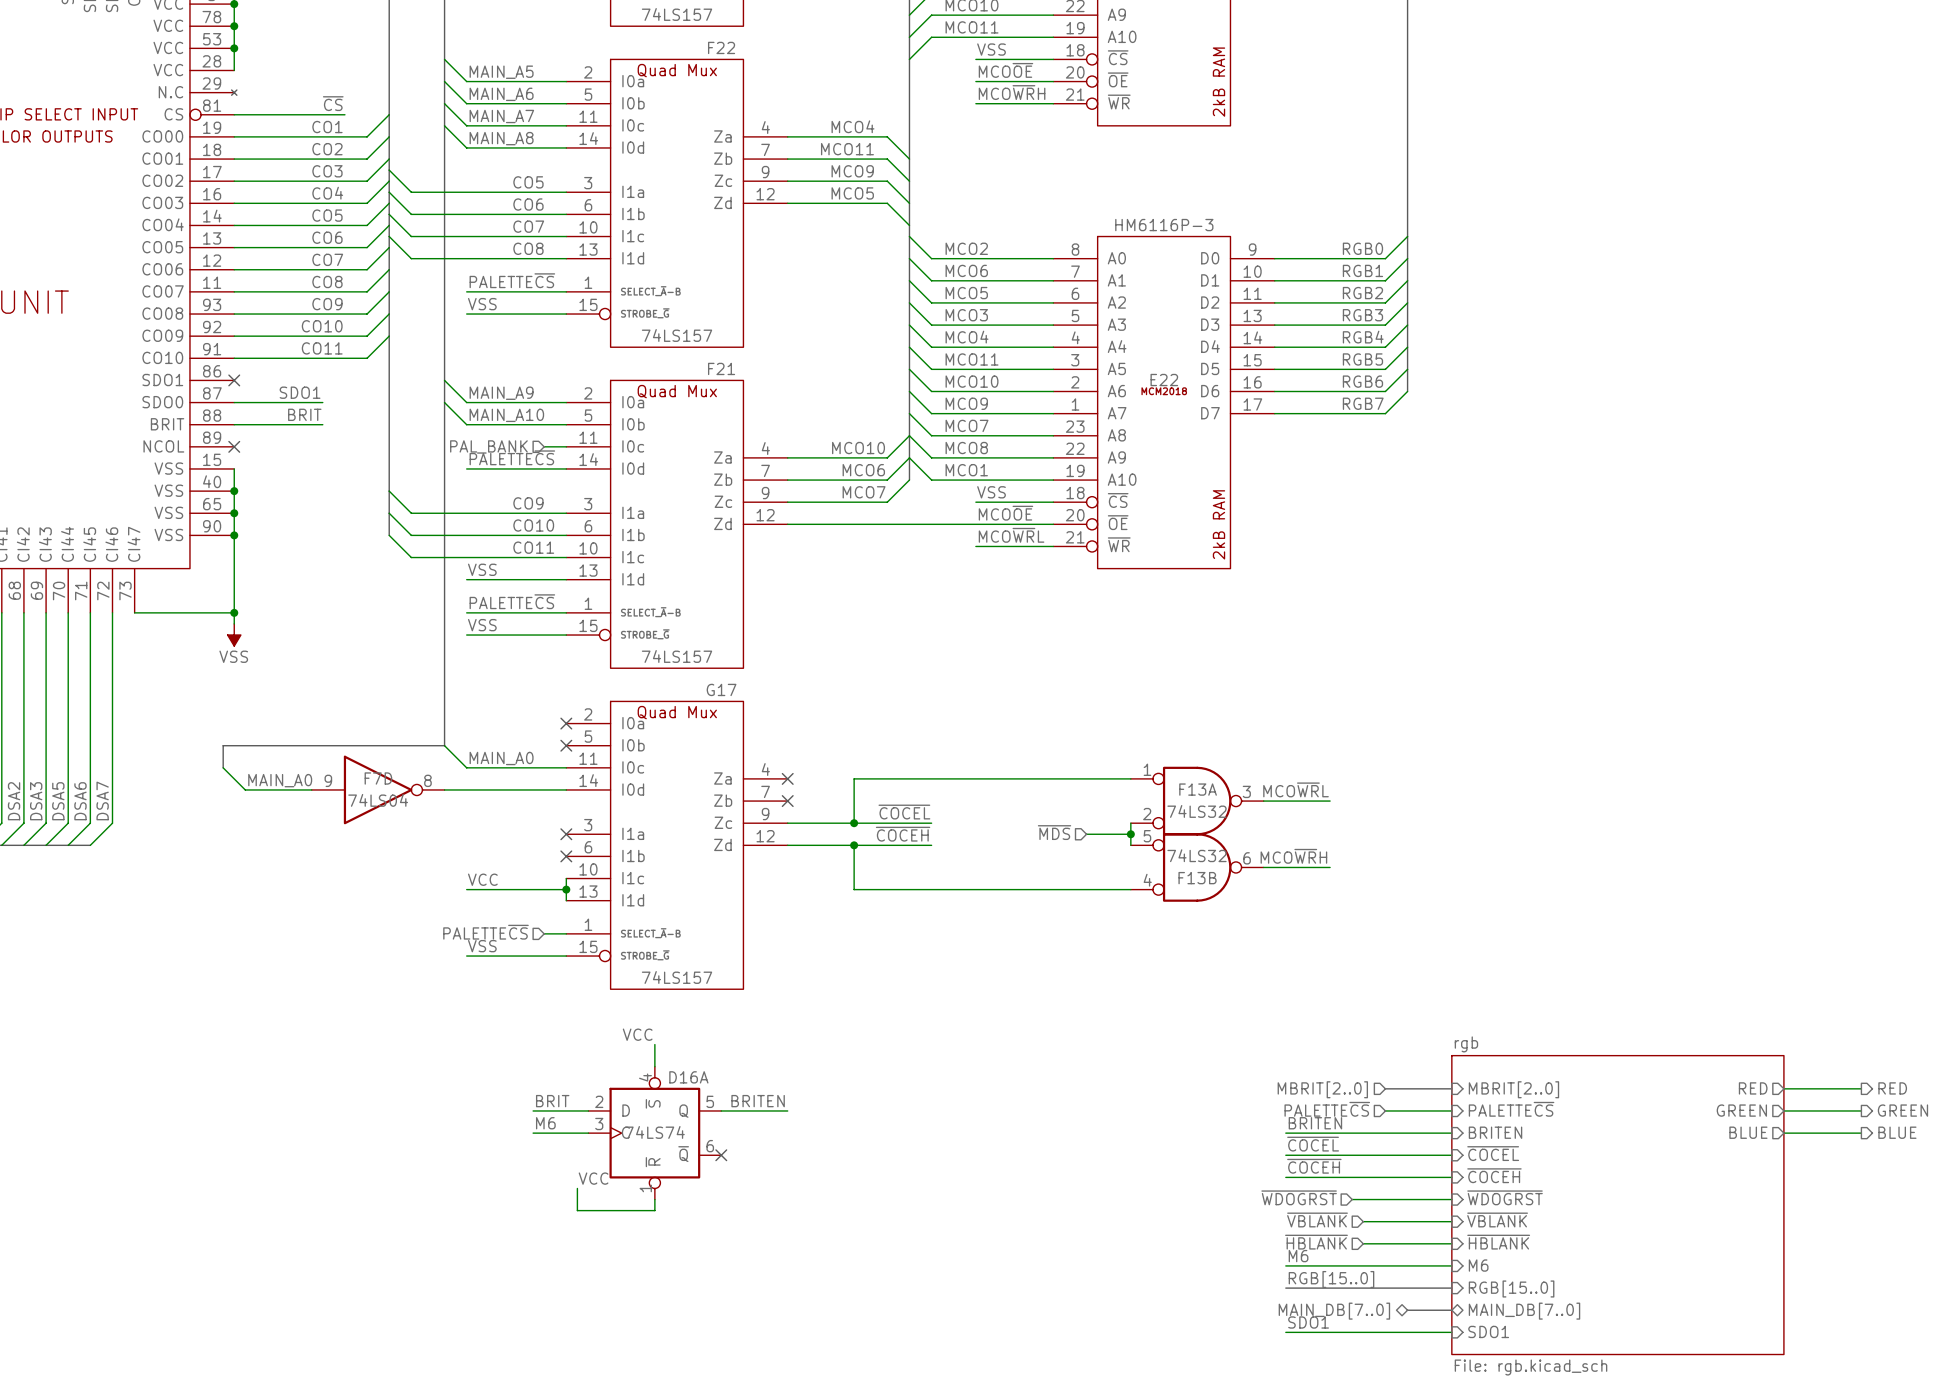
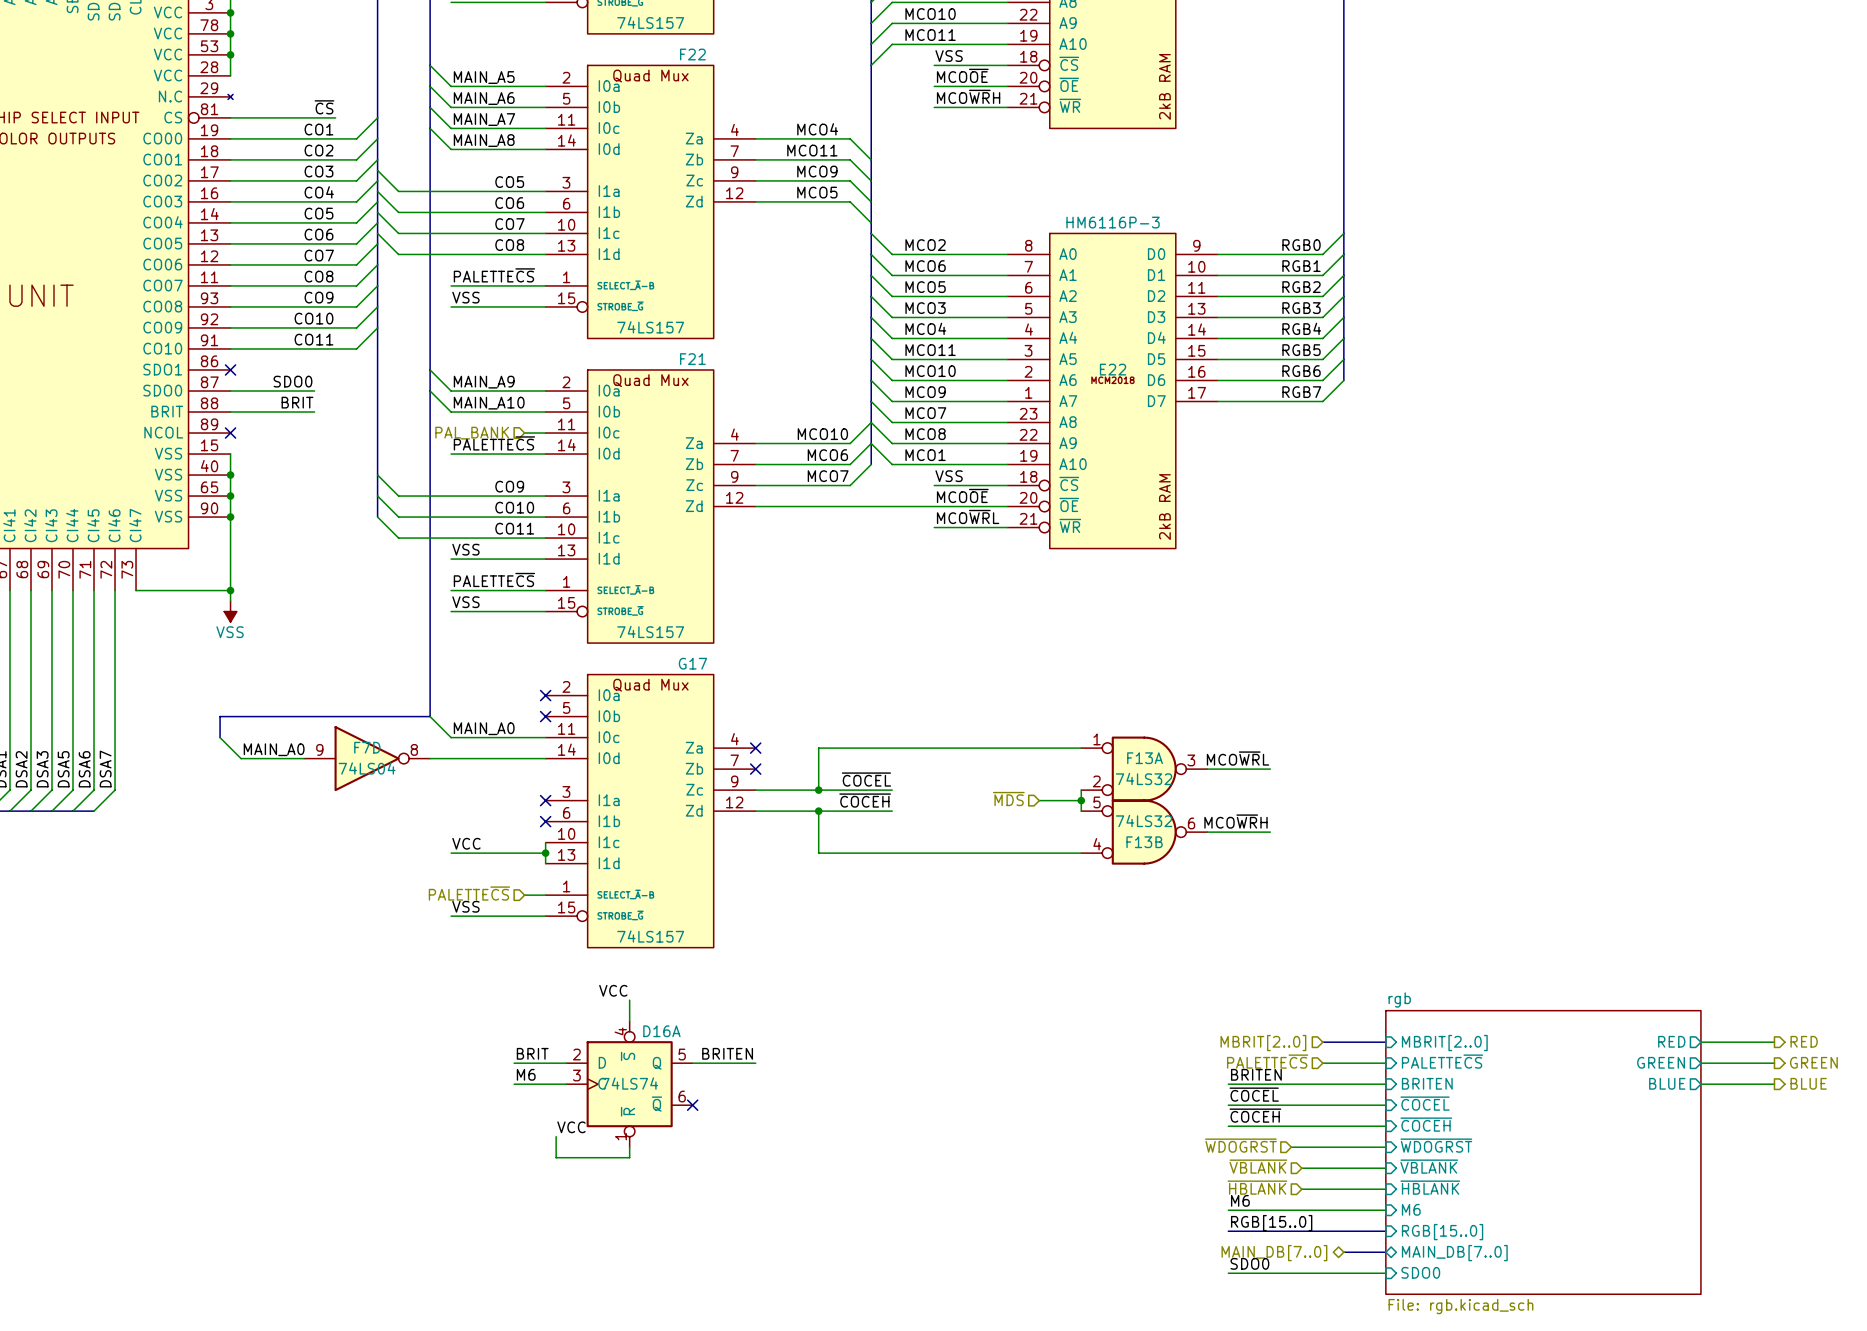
label: SDO1 (300, 392) -> SDO0 (292, 381)
label: SDO1 (1308, 1322) -> SDO0 (1249, 1263)
sheet pin: SDO1 (1488, 1331) -> SDO0 (1420, 1272)

